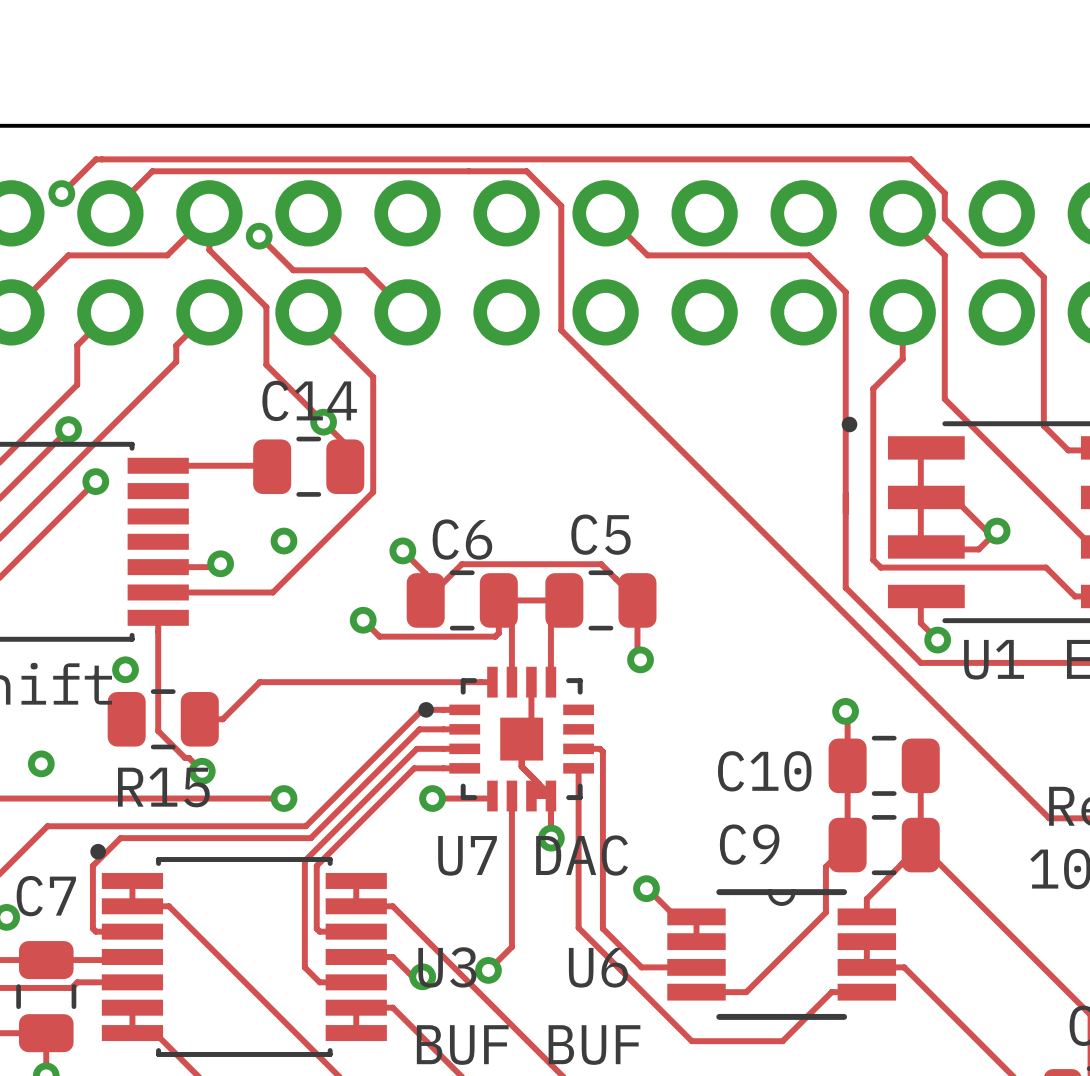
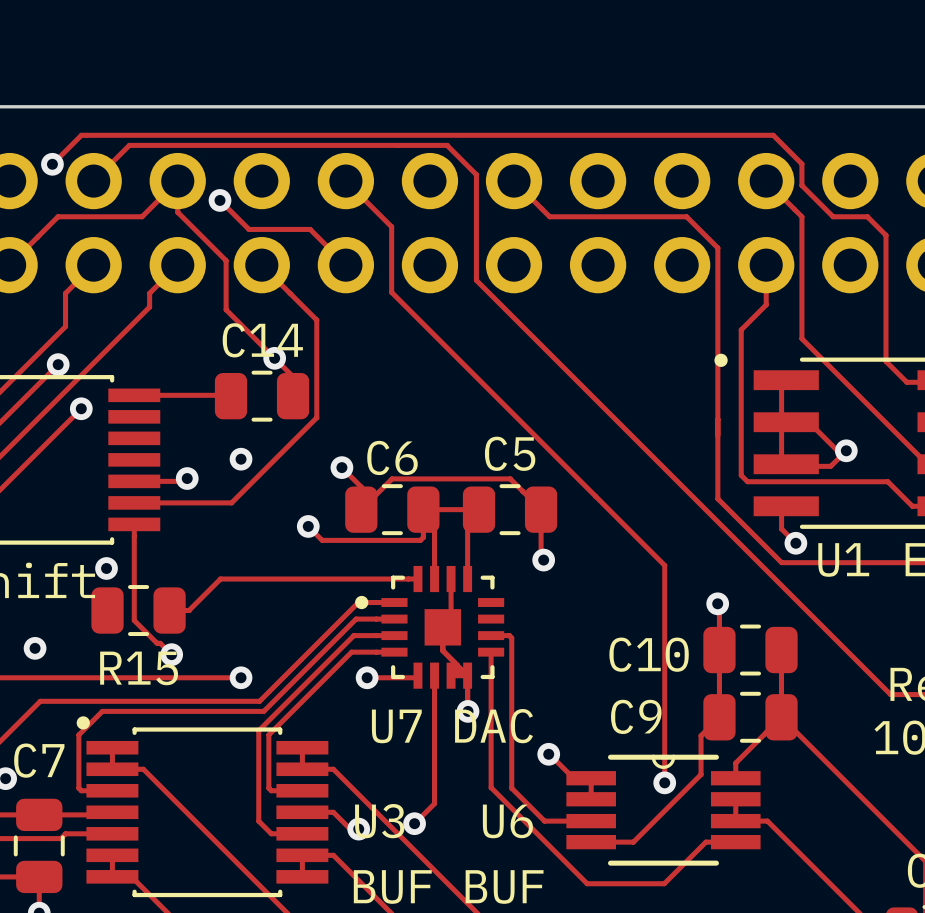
track: none -> (345, 181) (391, 226) (391, 292) (664, 565) (664, 782)
via: none -> (664, 782)

